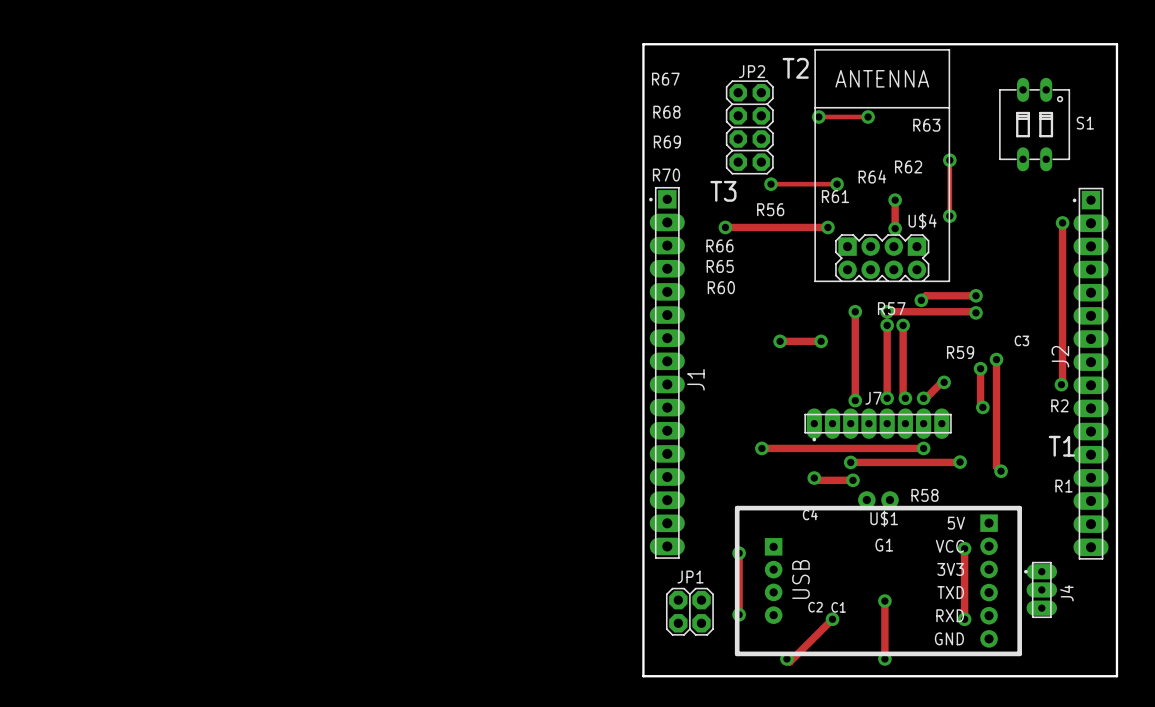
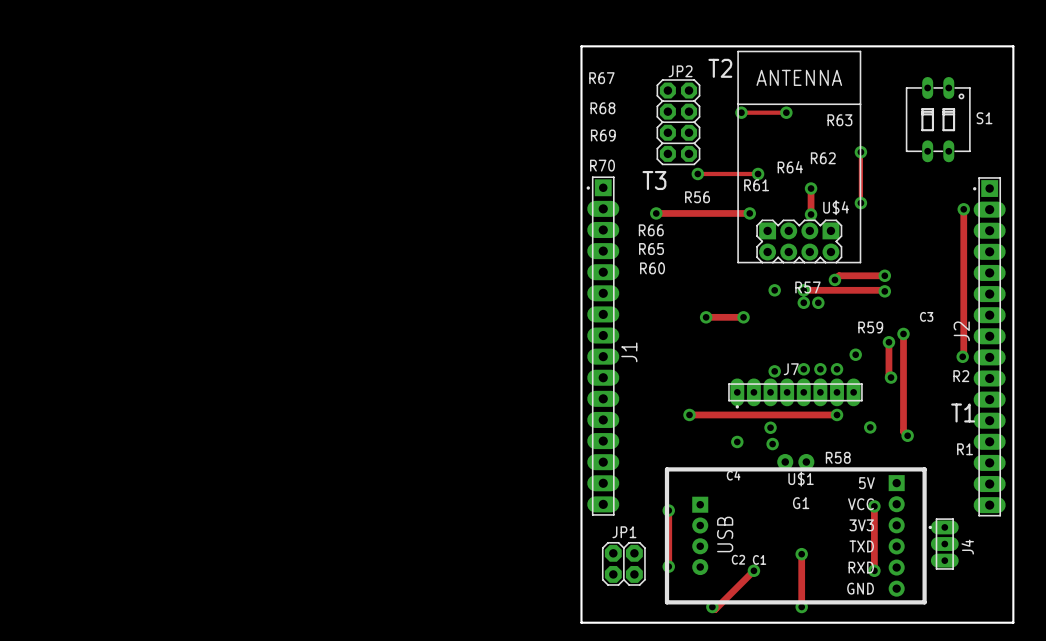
track: (855, 311) (855, 400) -> none
track: (887, 325) (887, 398) -> none
track: (903, 325) (903, 396) (905, 398) -> none
track: (944, 382) (923, 398) -> none
track: (960, 462) (850, 462) -> none
track: (814, 478) (816, 480) (853, 480) -> none

